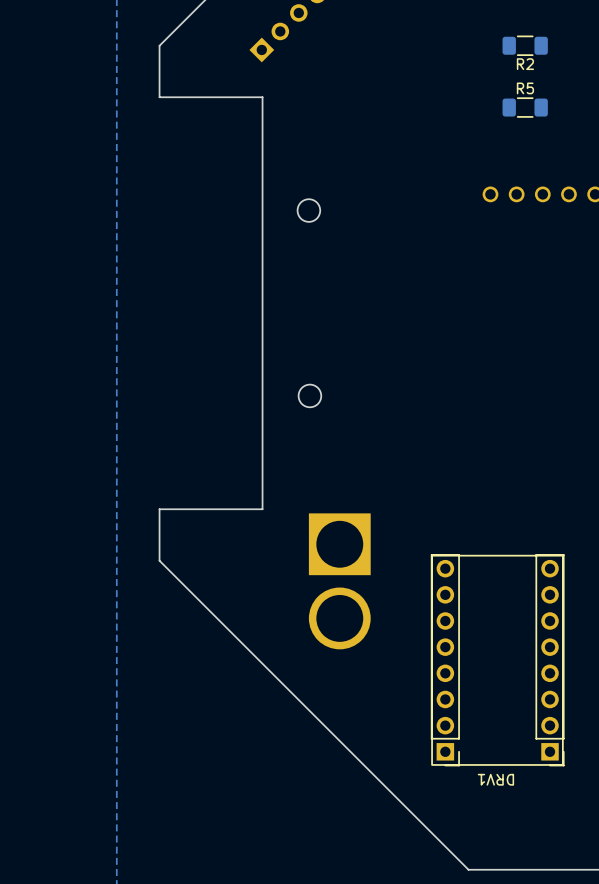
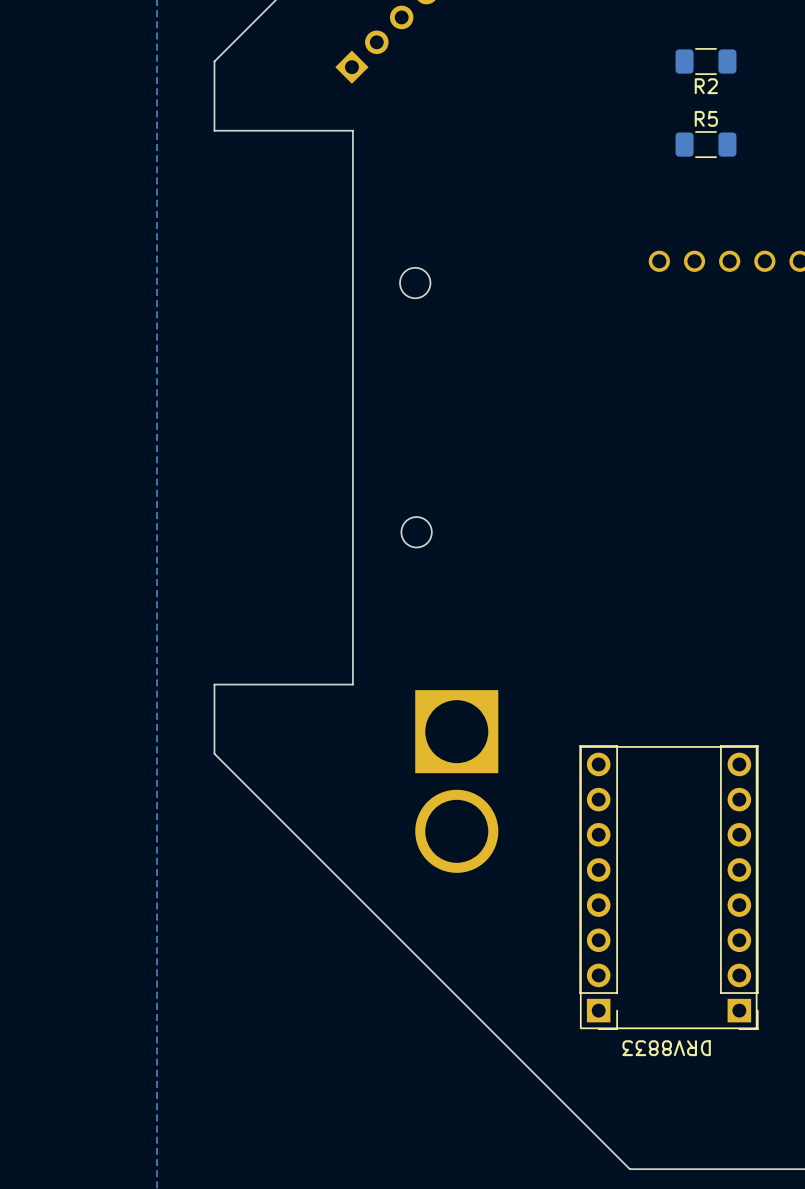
DRV1 name: DRV1 (495, 779) -> DRV8833 (666, 1048)

